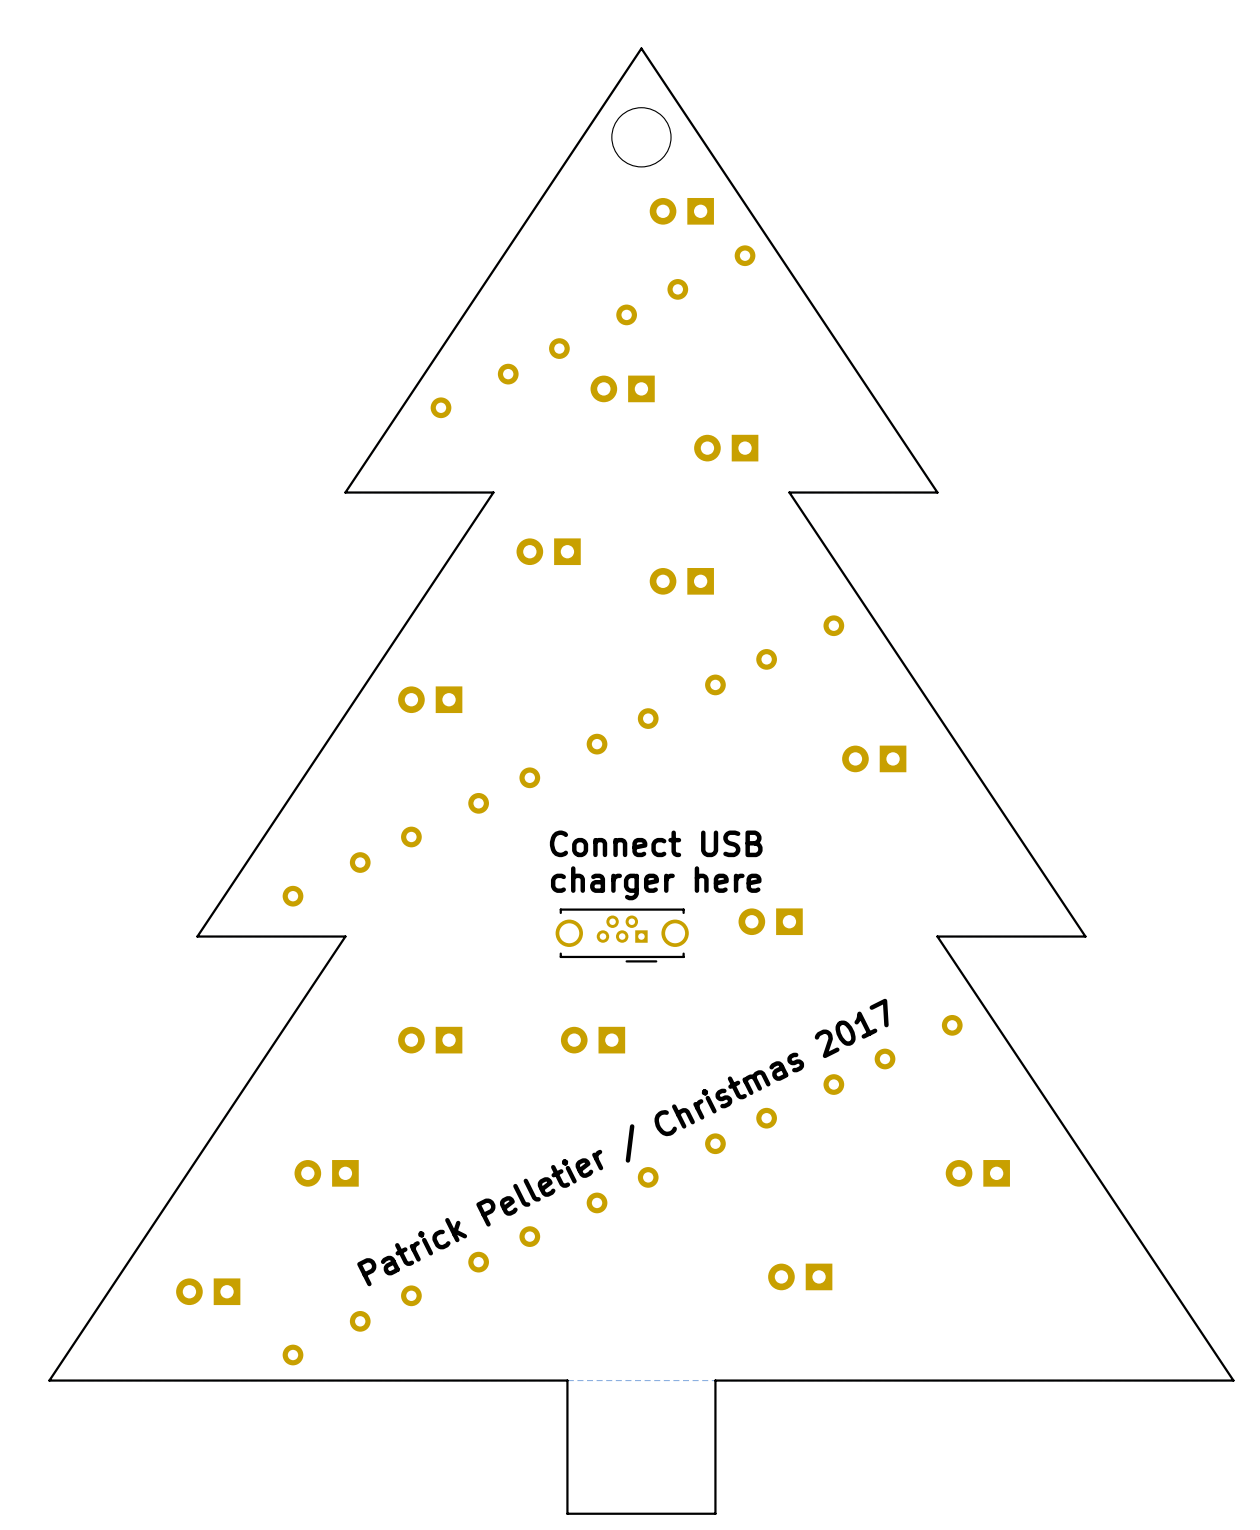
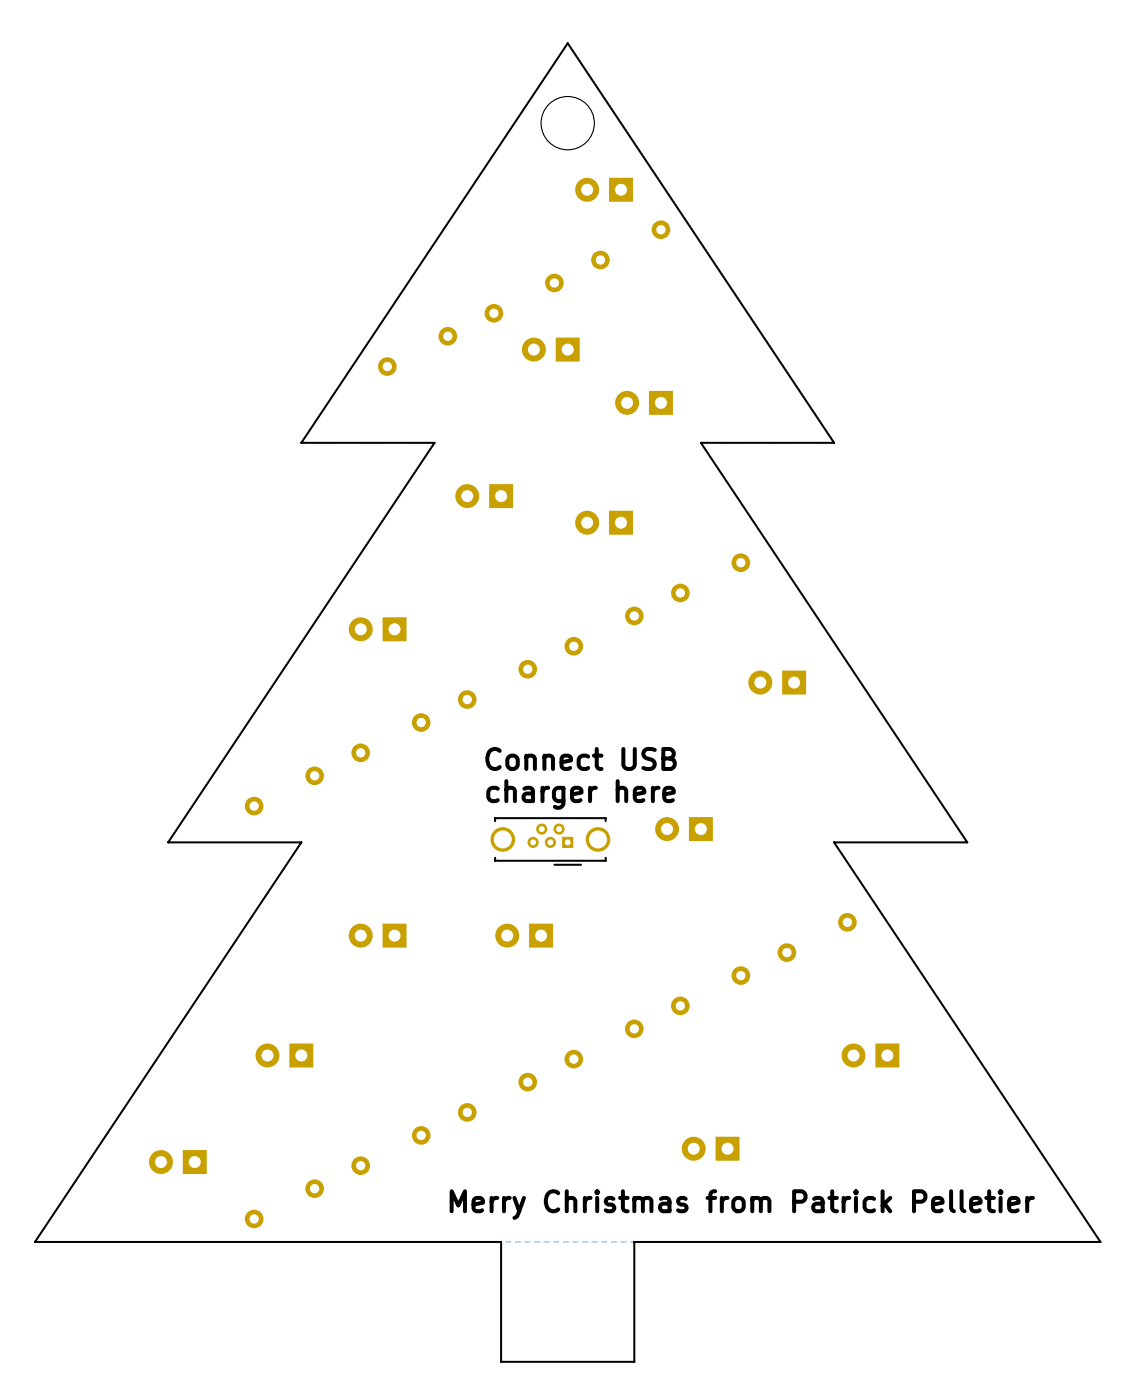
text: Patrick Pelletier / Christmas 2017 (622, 1142) -> none
text: none -> Merry Christmas from Patrick Pelletier (742, 1204)

